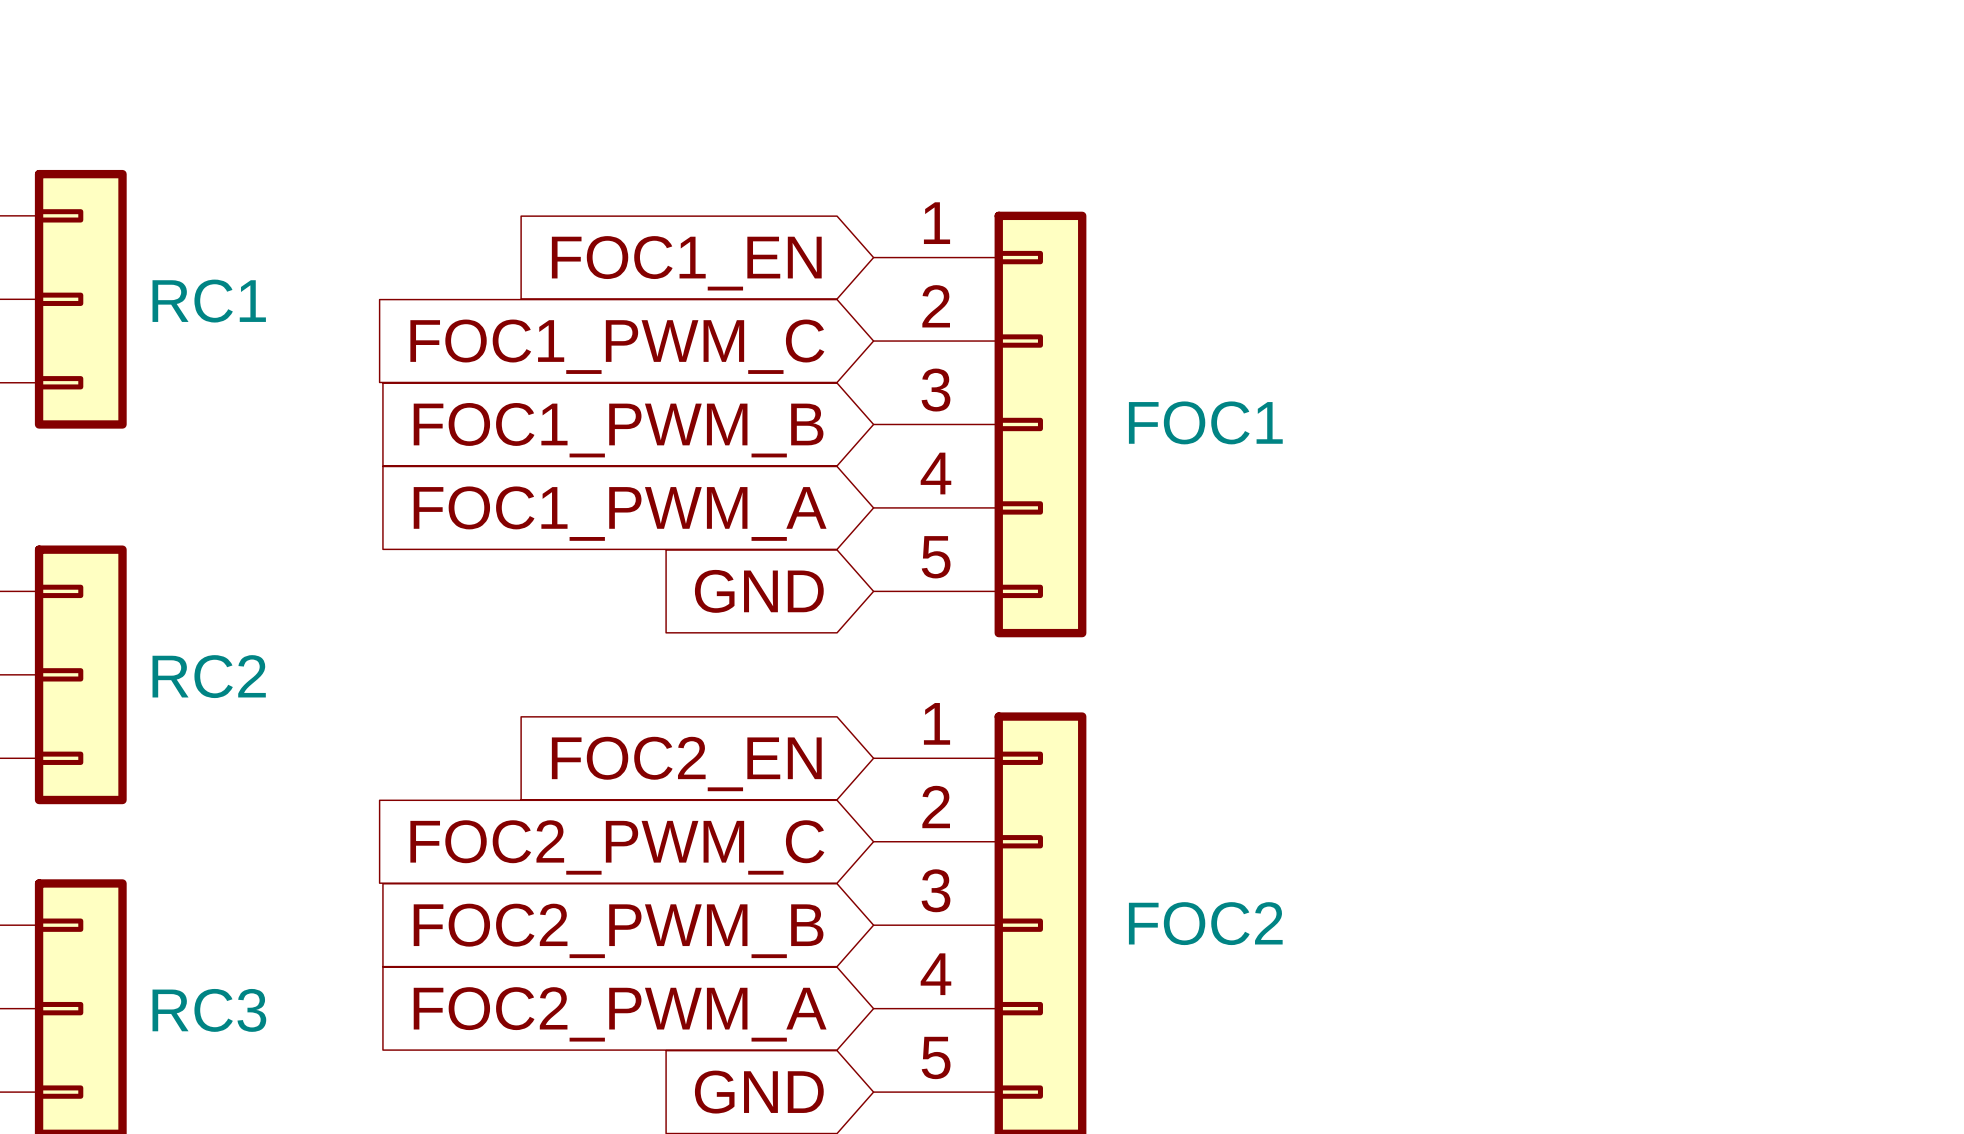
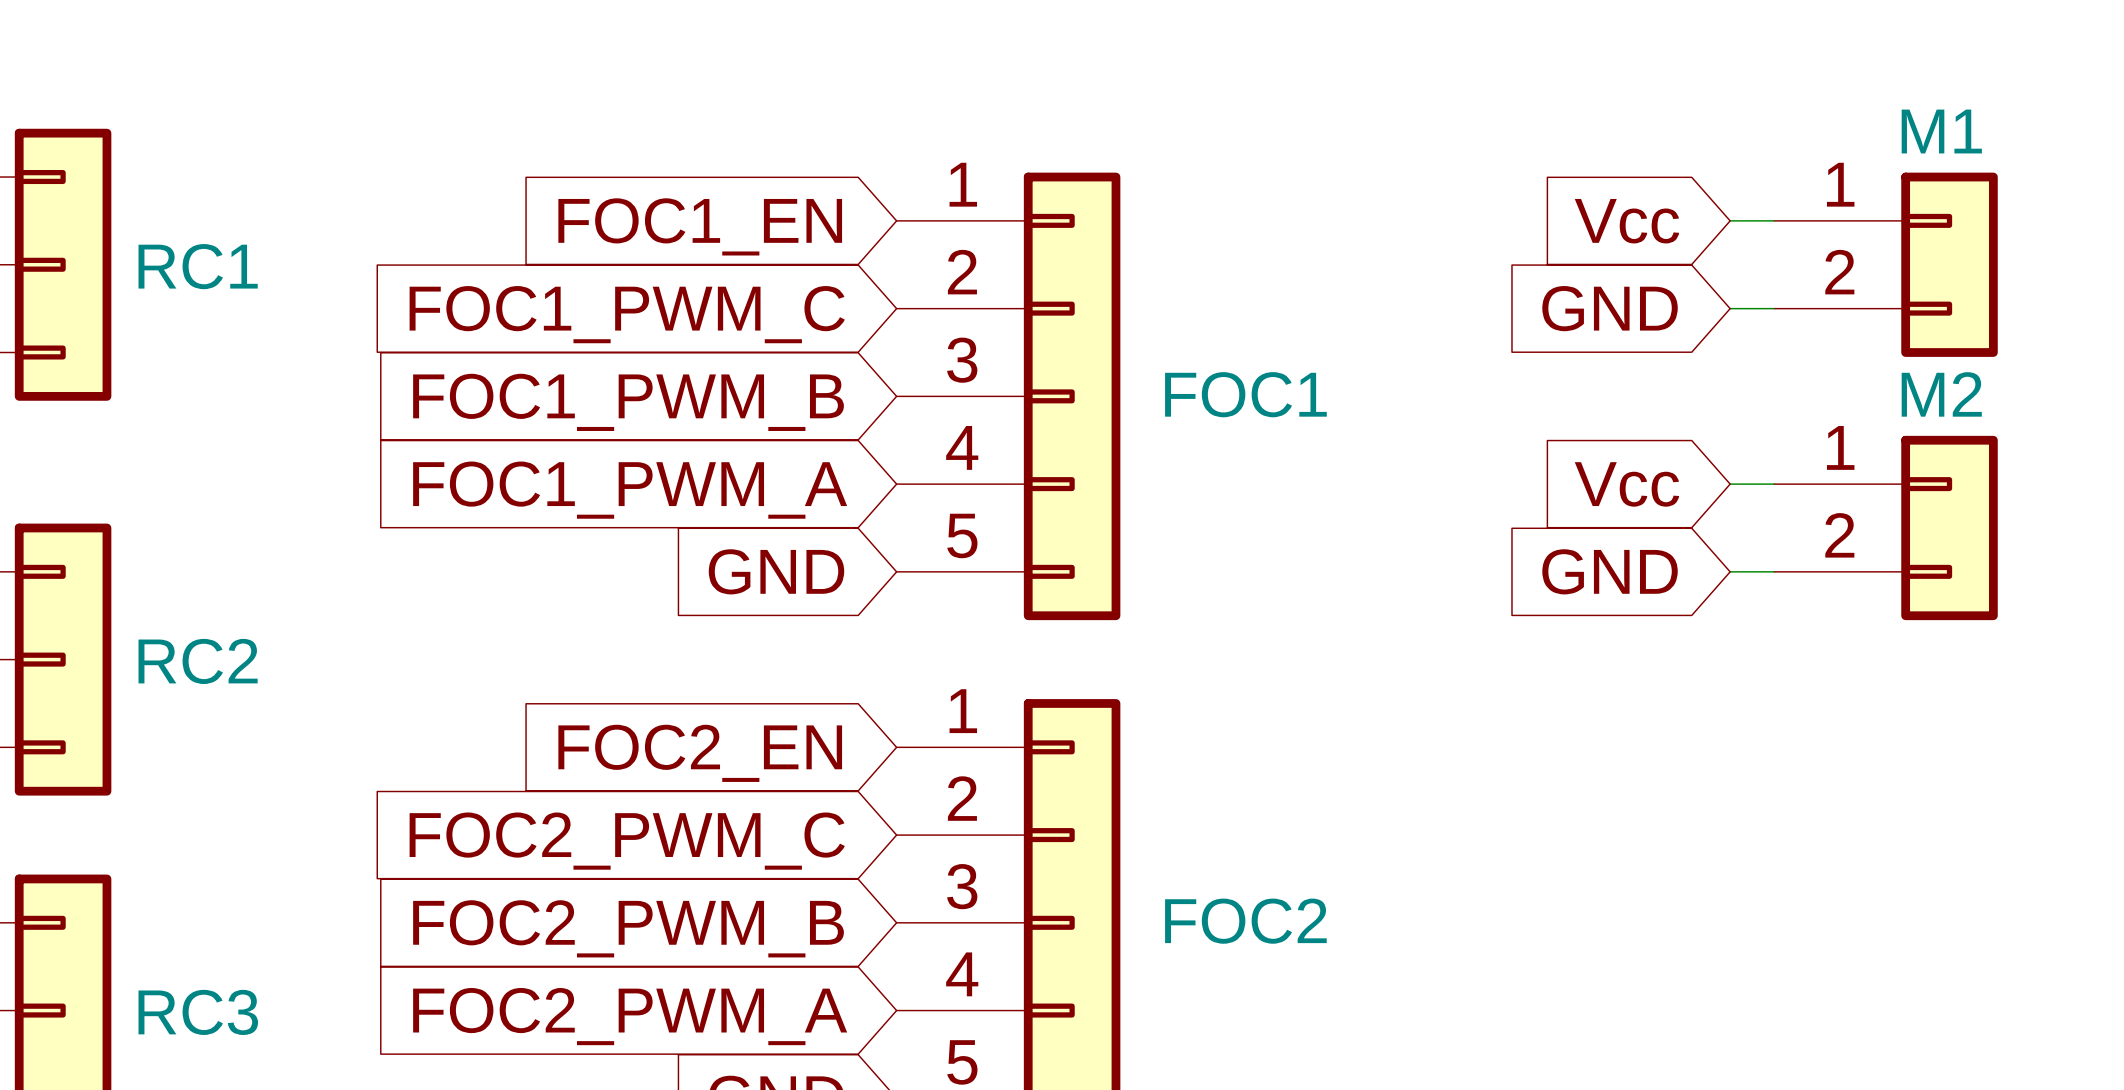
global label: none -> Vcc (1626, 221)
wire: none -> (1730, 220) (1774, 220)
M1: none -> (1885, 264)
global label: none -> GND (1610, 308)
wire: none -> (1730, 308) (1774, 308)
wire: none -> (1730, 484) (1774, 484)
global label: none -> Vcc (1626, 484)
M2: none -> (1885, 527)
global label: none -> GND (1610, 571)
wire: none -> (1730, 571) (1774, 571)

